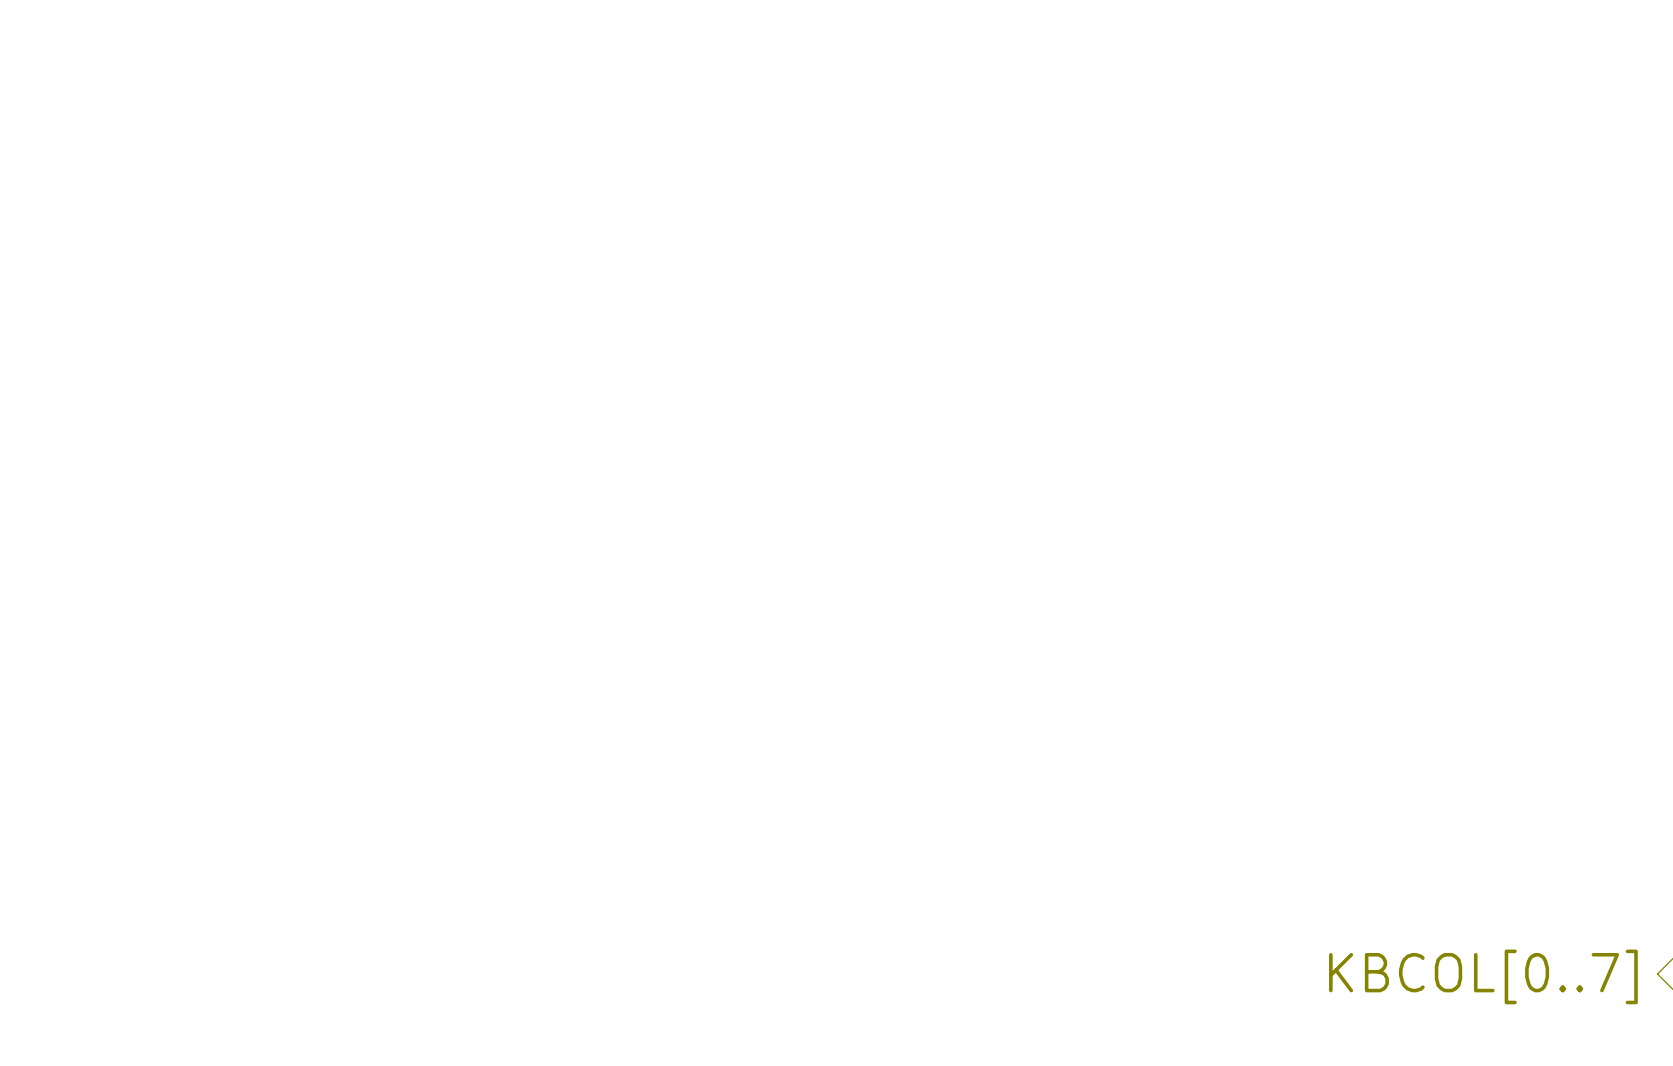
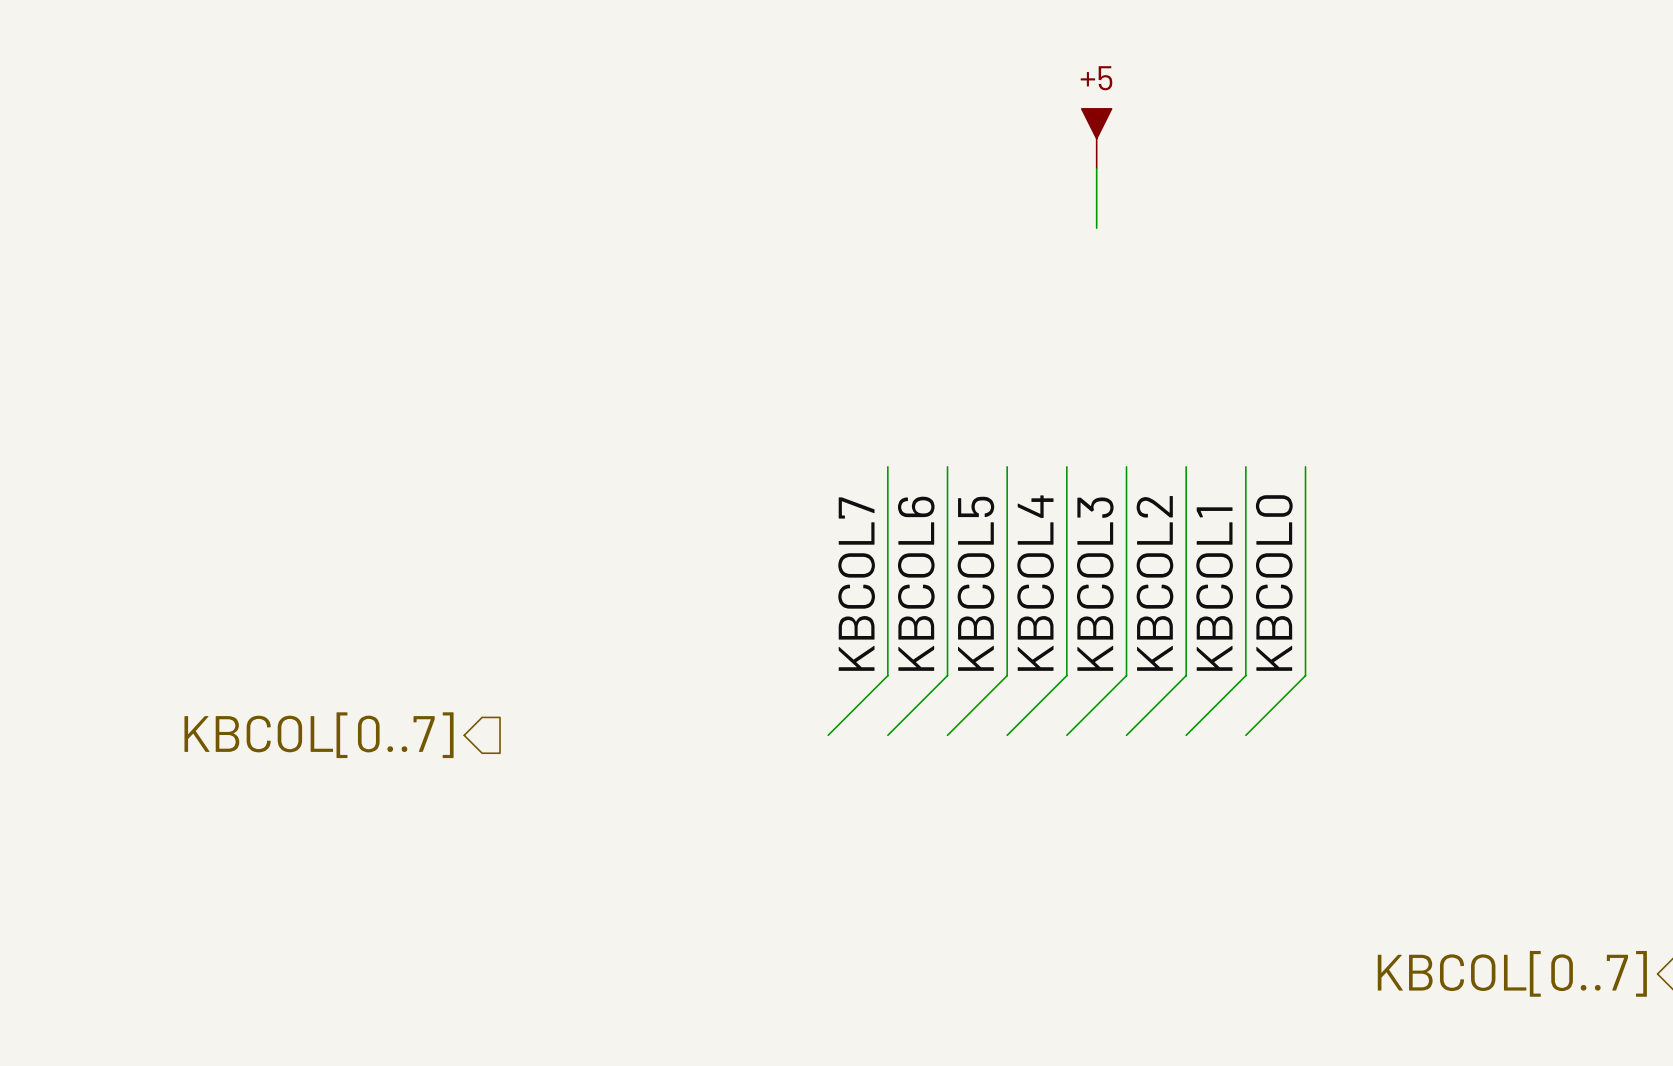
power symbol: none -> (1096, 138)
wire: none -> (1096, 168) (1096, 228)
wire: none -> (887, 466) (887, 675) (828, 735)
wire: none -> (947, 466) (947, 675) (887, 735)
wire: none -> (1007, 466) (1007, 675) (947, 735)
wire: none -> (1066, 466) (1066, 675) (1007, 735)
wire: none -> (1126, 466) (1126, 675) (1066, 735)
wire: none -> (1186, 466) (1186, 675) (1126, 735)
wire: none -> (1245, 466) (1245, 675) (1186, 735)
wire: none -> (1305, 466) (1305, 675) (1245, 735)
label: none -> KBCOL7 (856, 584)
label: none -> KBCOL4 (1035, 583)
label: none -> KBCOL6 (916, 583)
label: none -> KBCOL5 (975, 583)
label: none -> KBCOL3 (1095, 584)
label: none -> KBCOL2 (1154, 583)
label: none -> KBCOL1 (1214, 589)
label: none -> KBCOL0 (1274, 583)
hierarchical label: none -> KBCOL[0..7] (319, 735)

